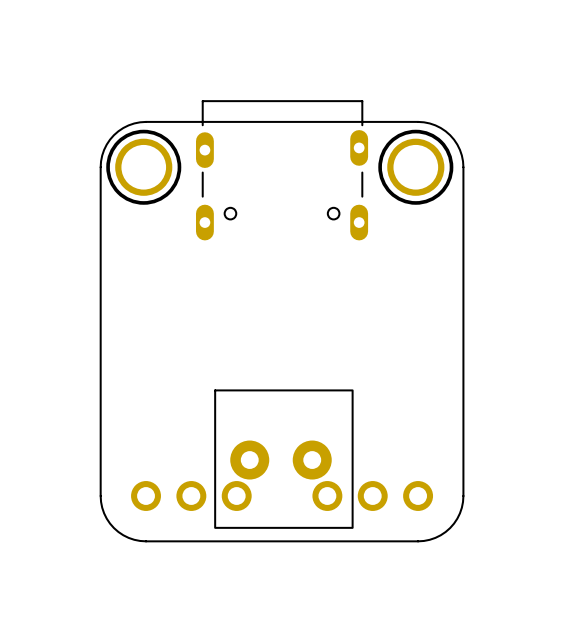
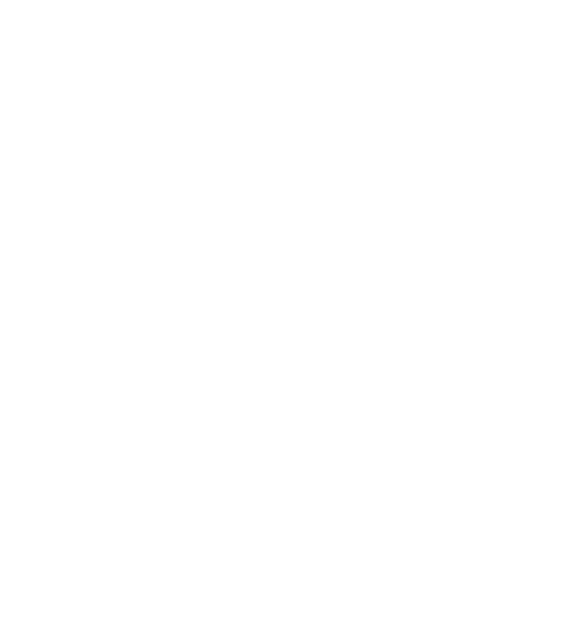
part: (282, 321) -> none

